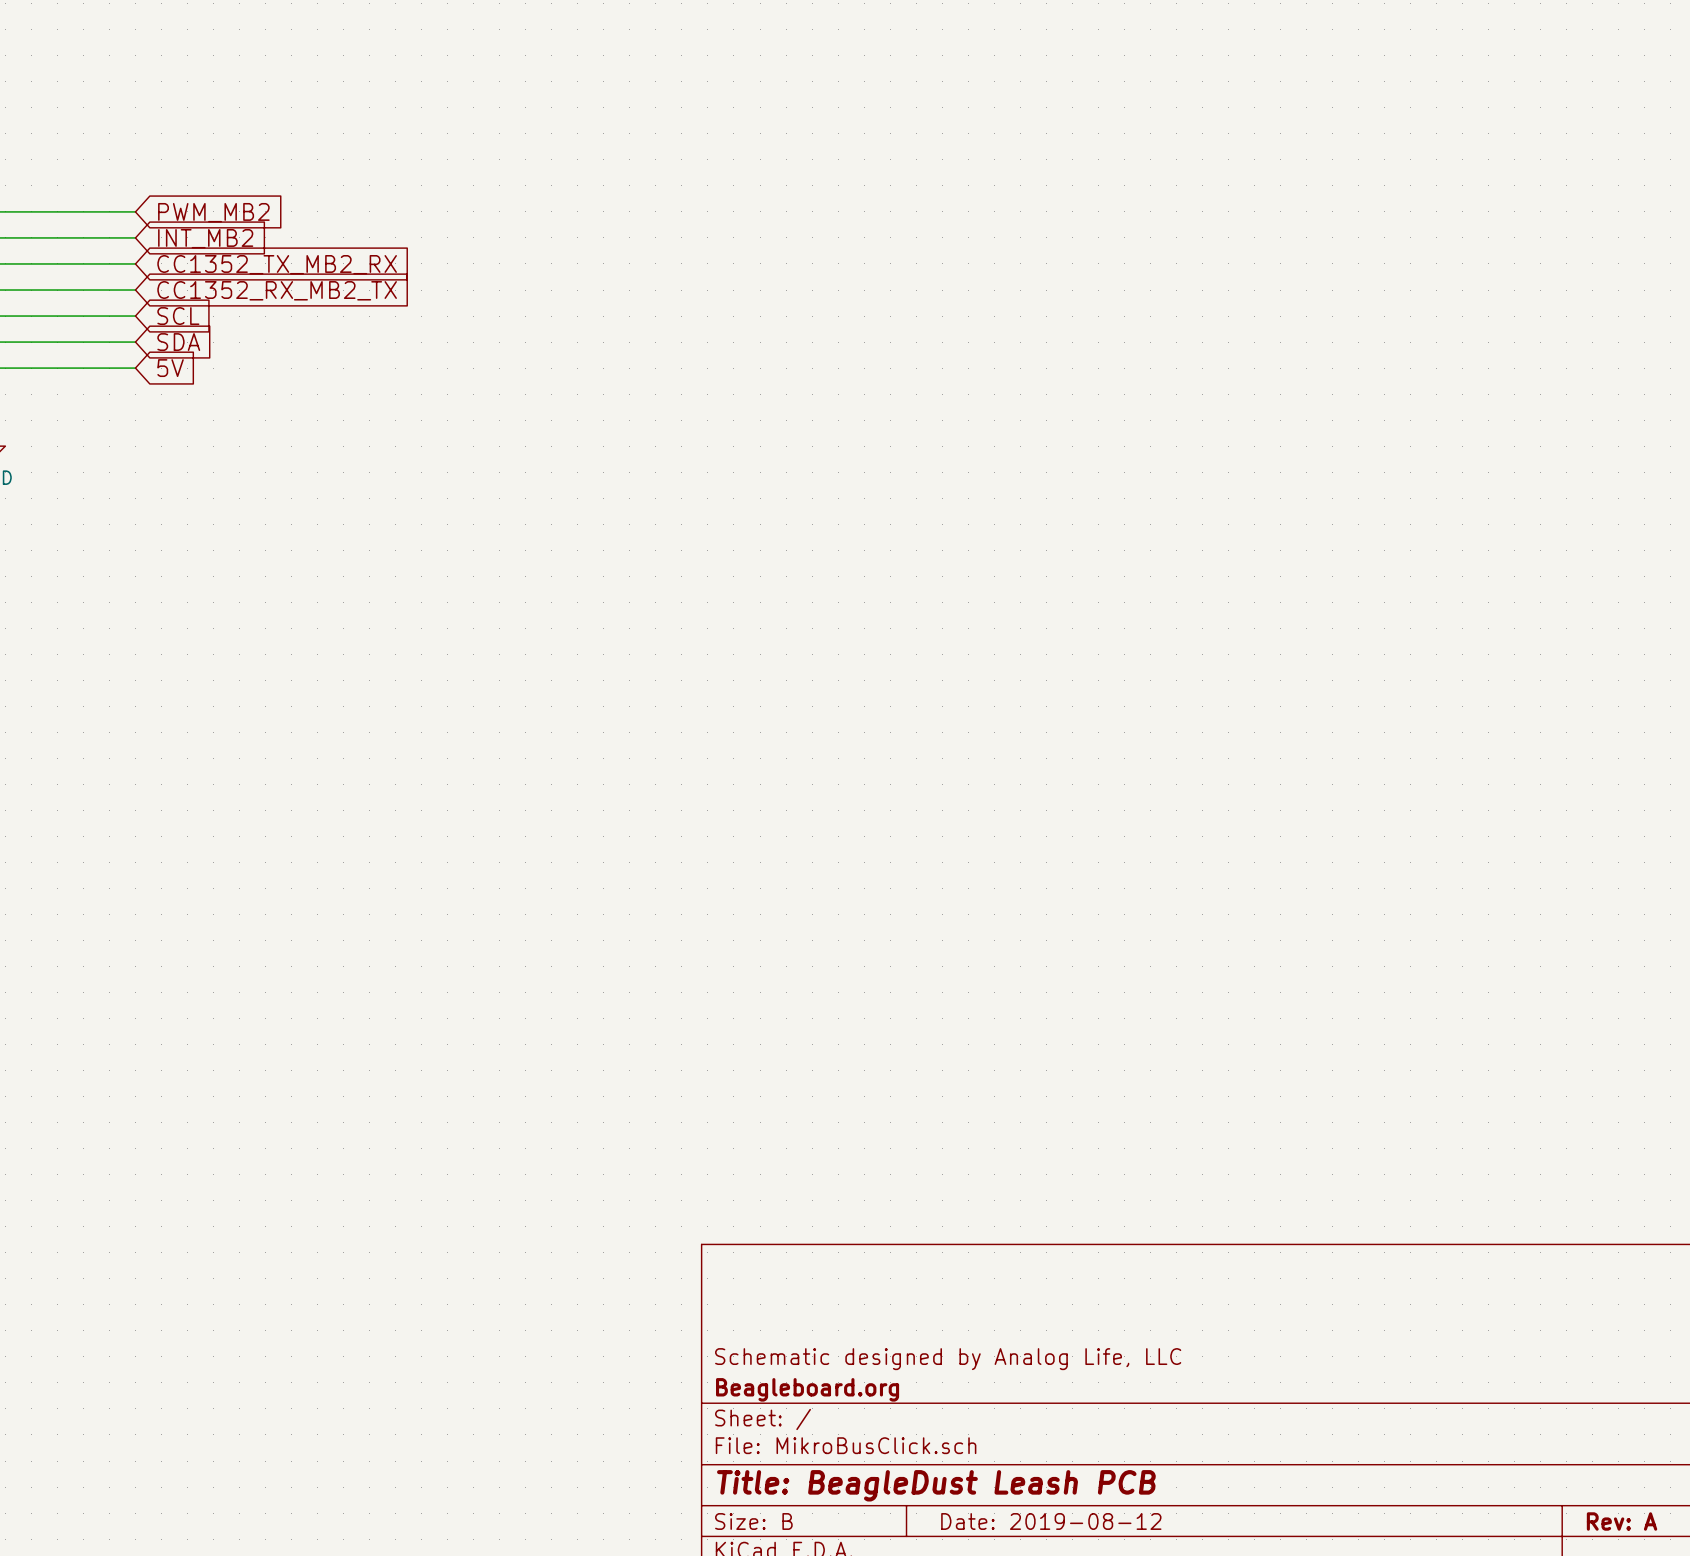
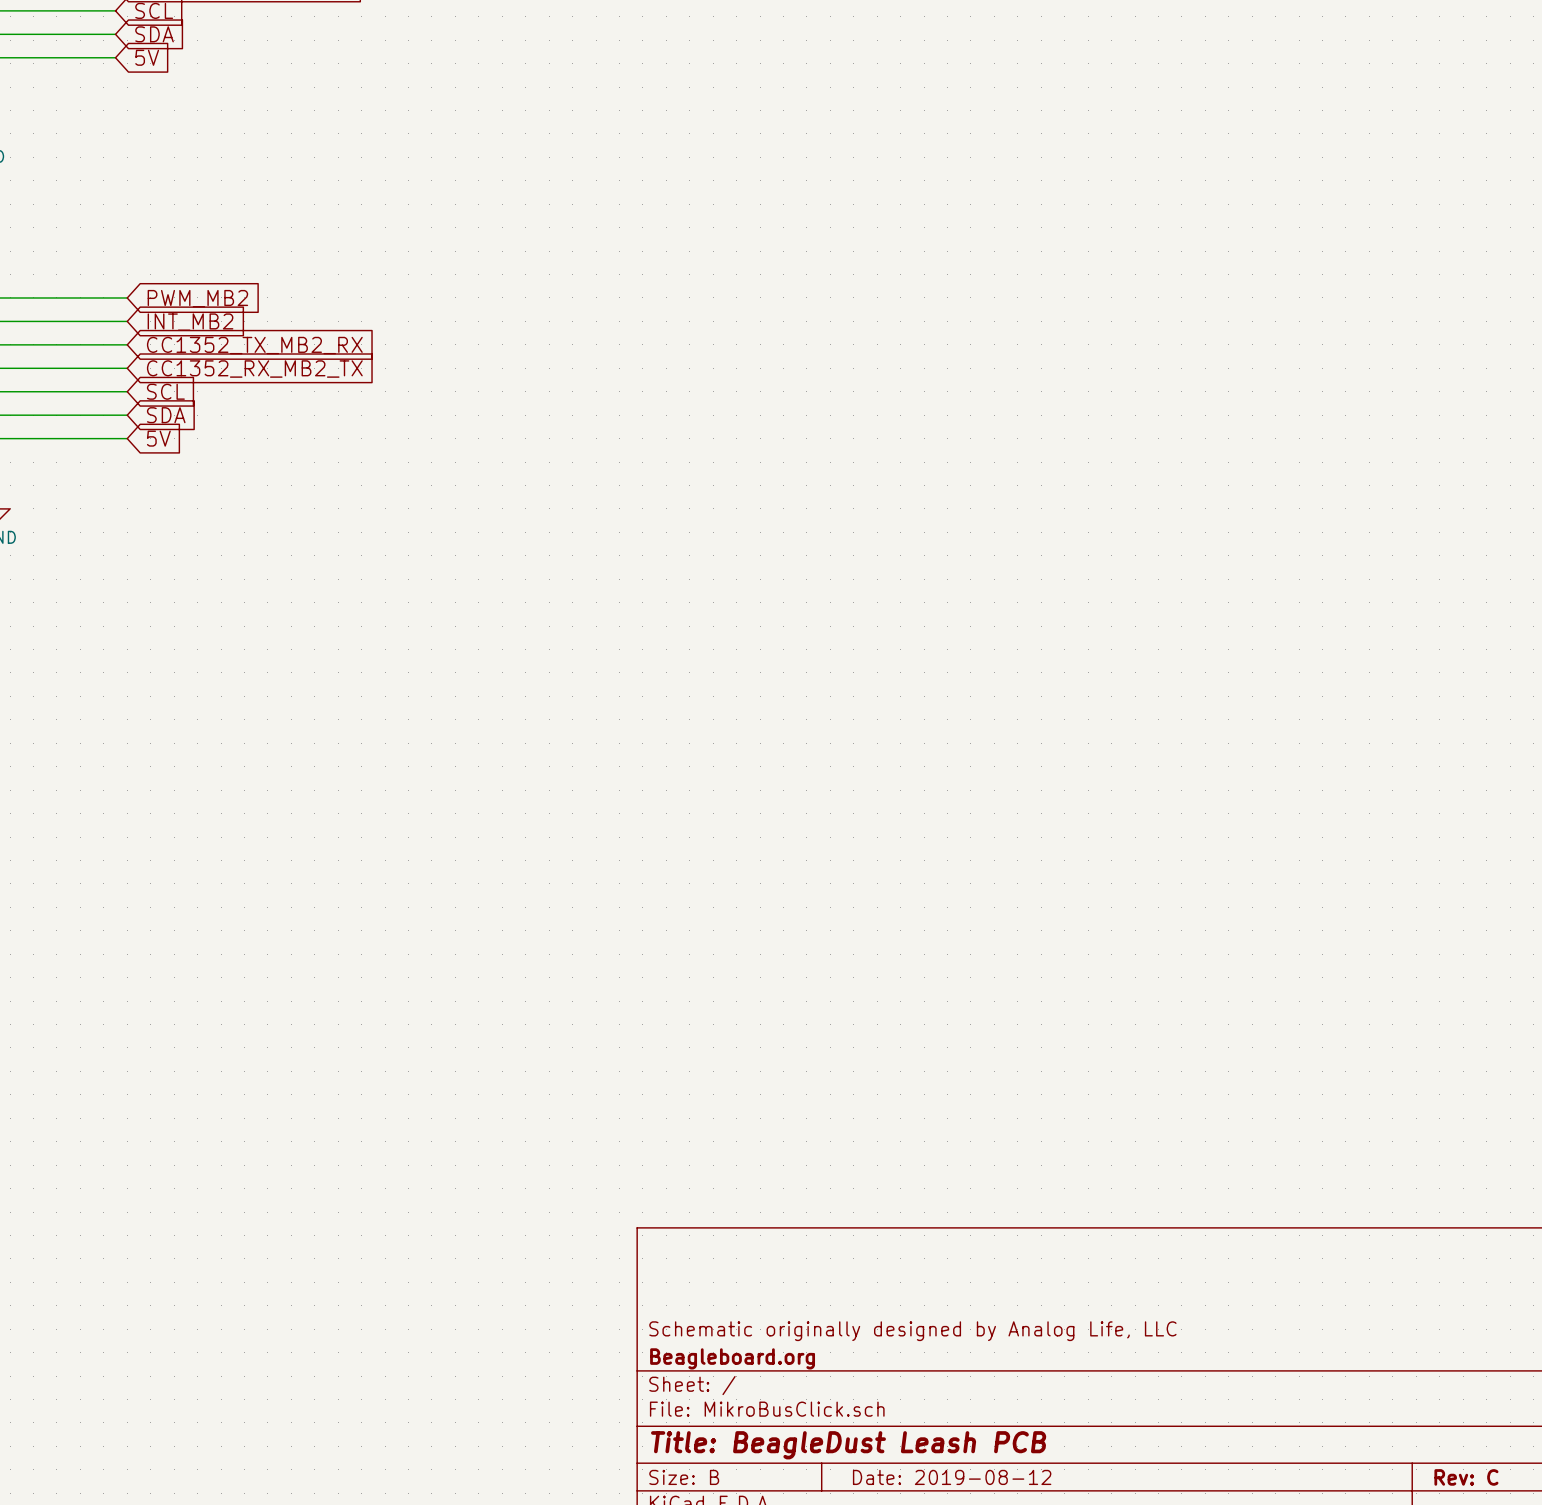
title block: Schematic designed by Analog Life, LLC (948, 1359) -> Schematic originally designed by Analog Life, LLC (912, 1331)
title block: Rev: A (1622, 1521) -> Rev: C (1466, 1477)

